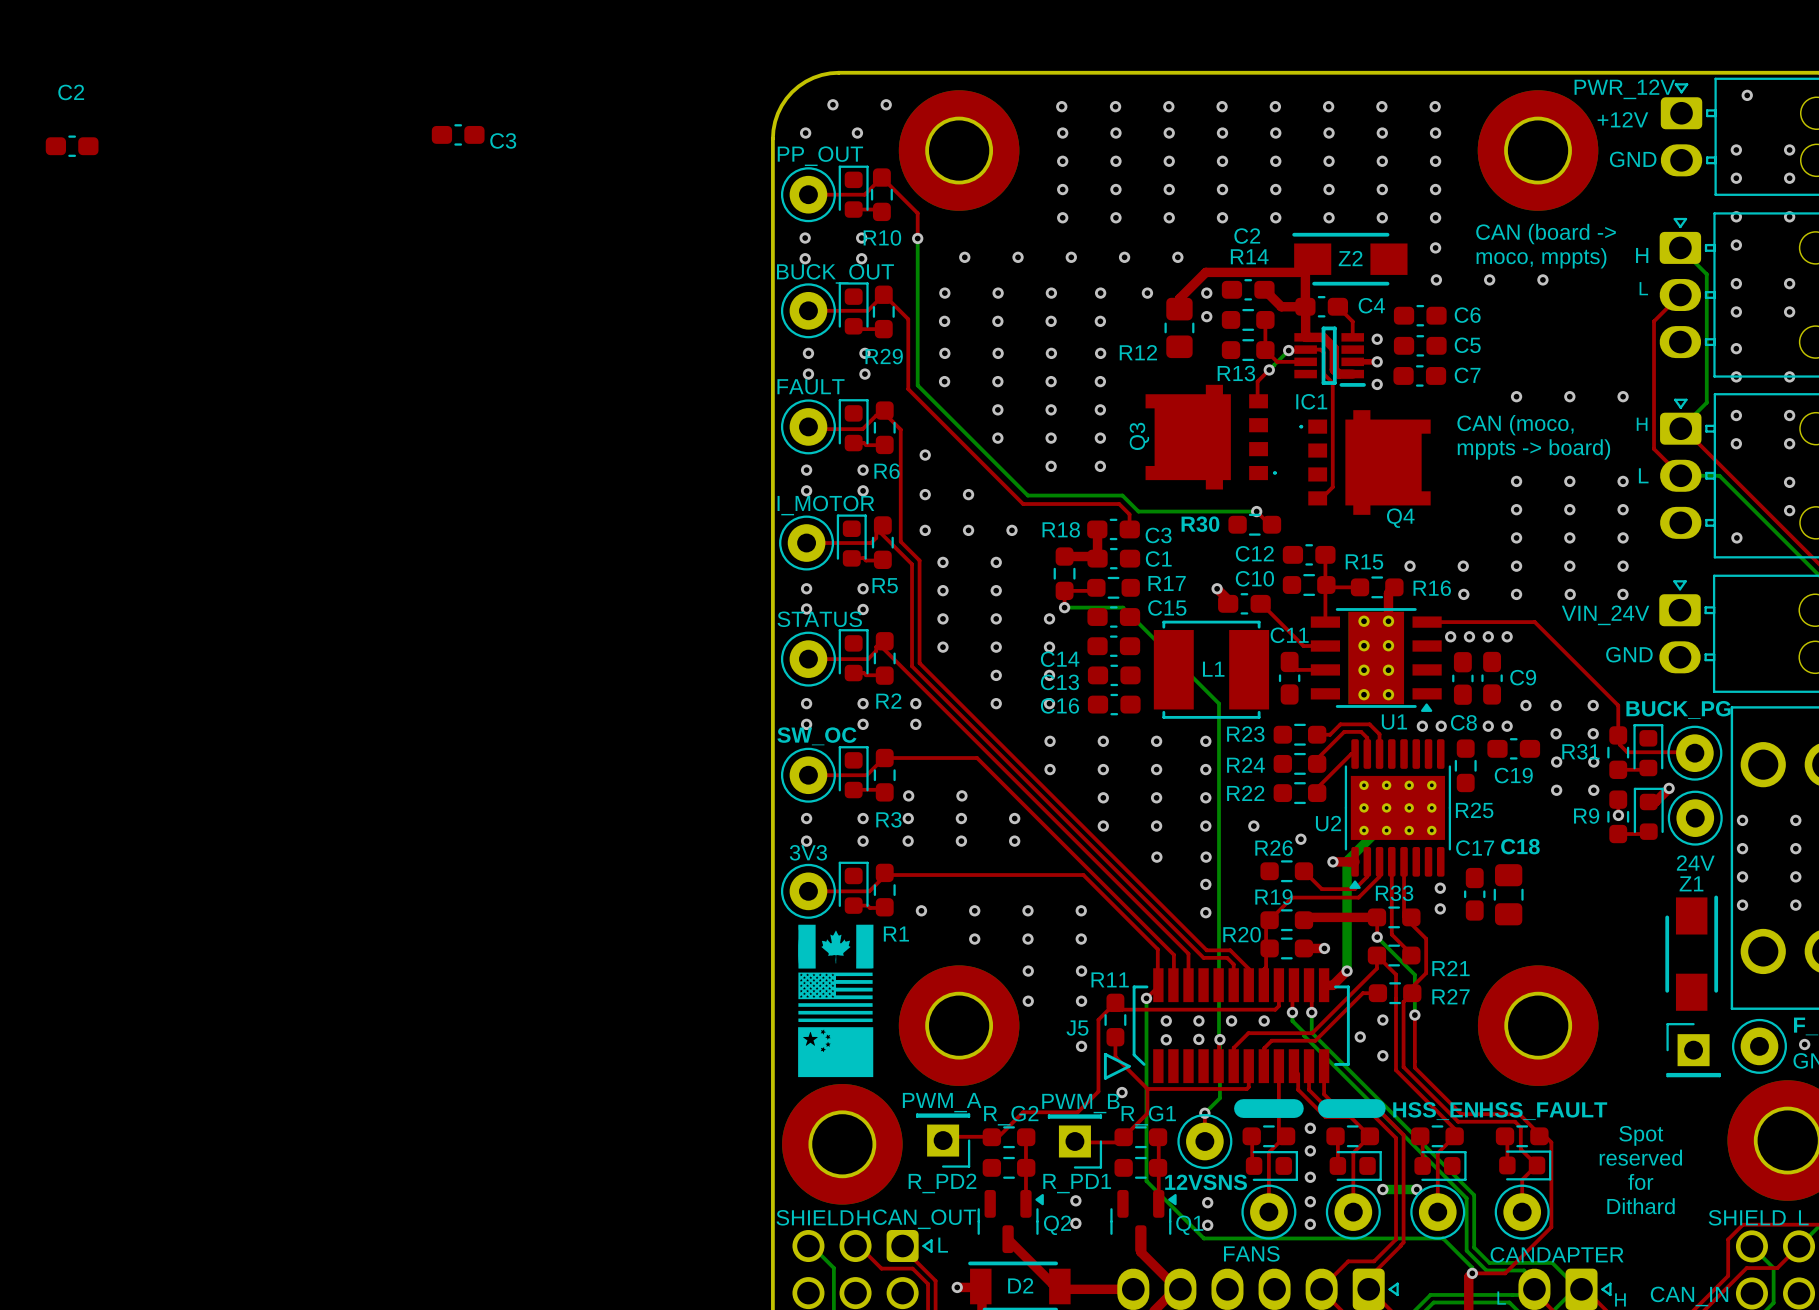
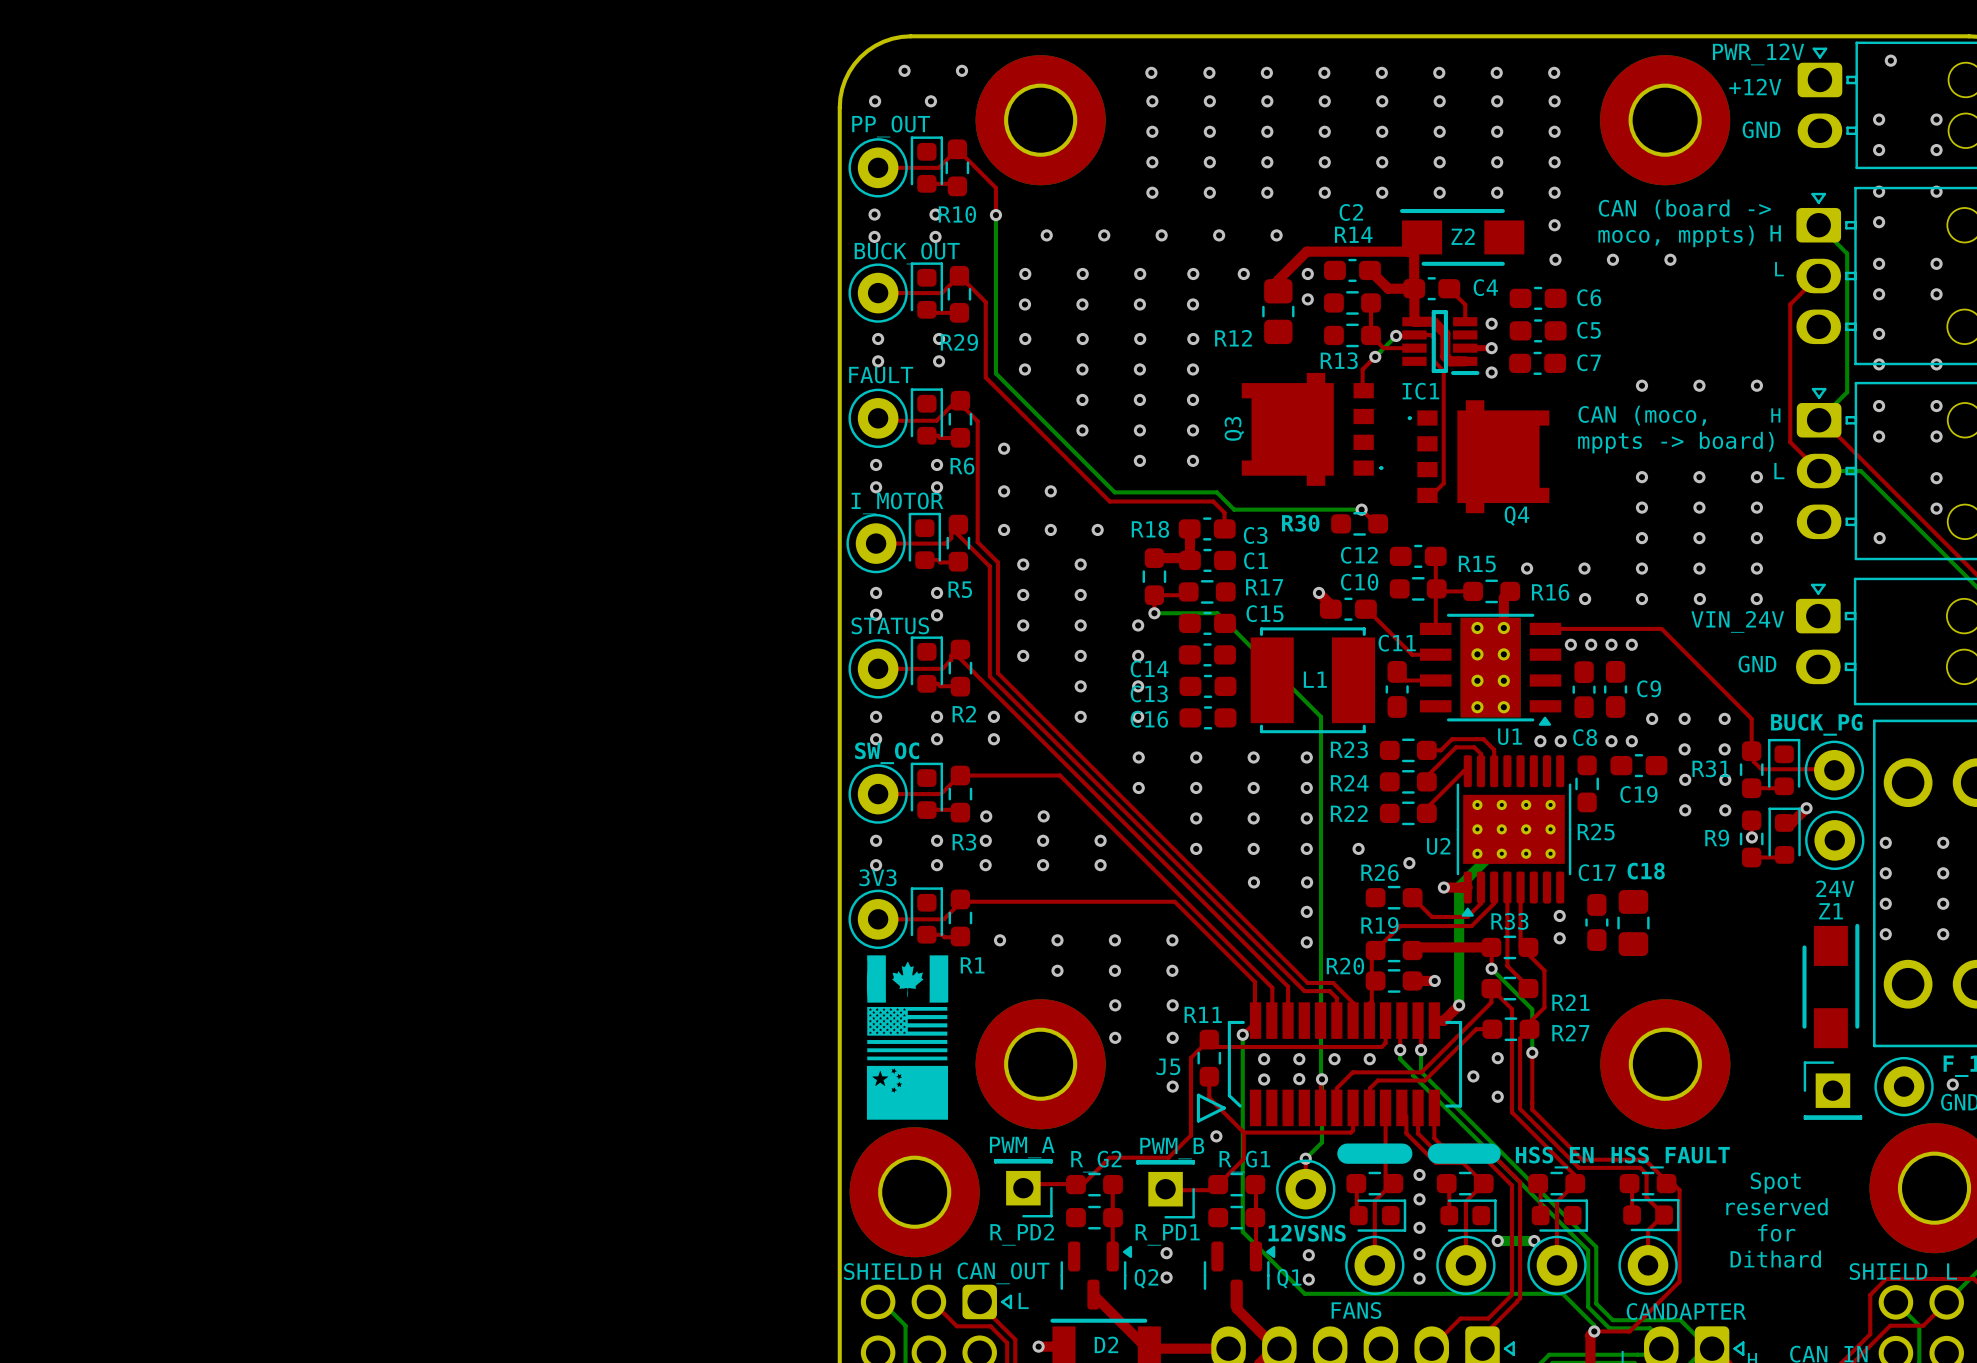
C3: (458, 134) -> none
C2: (72, 146) -> none

